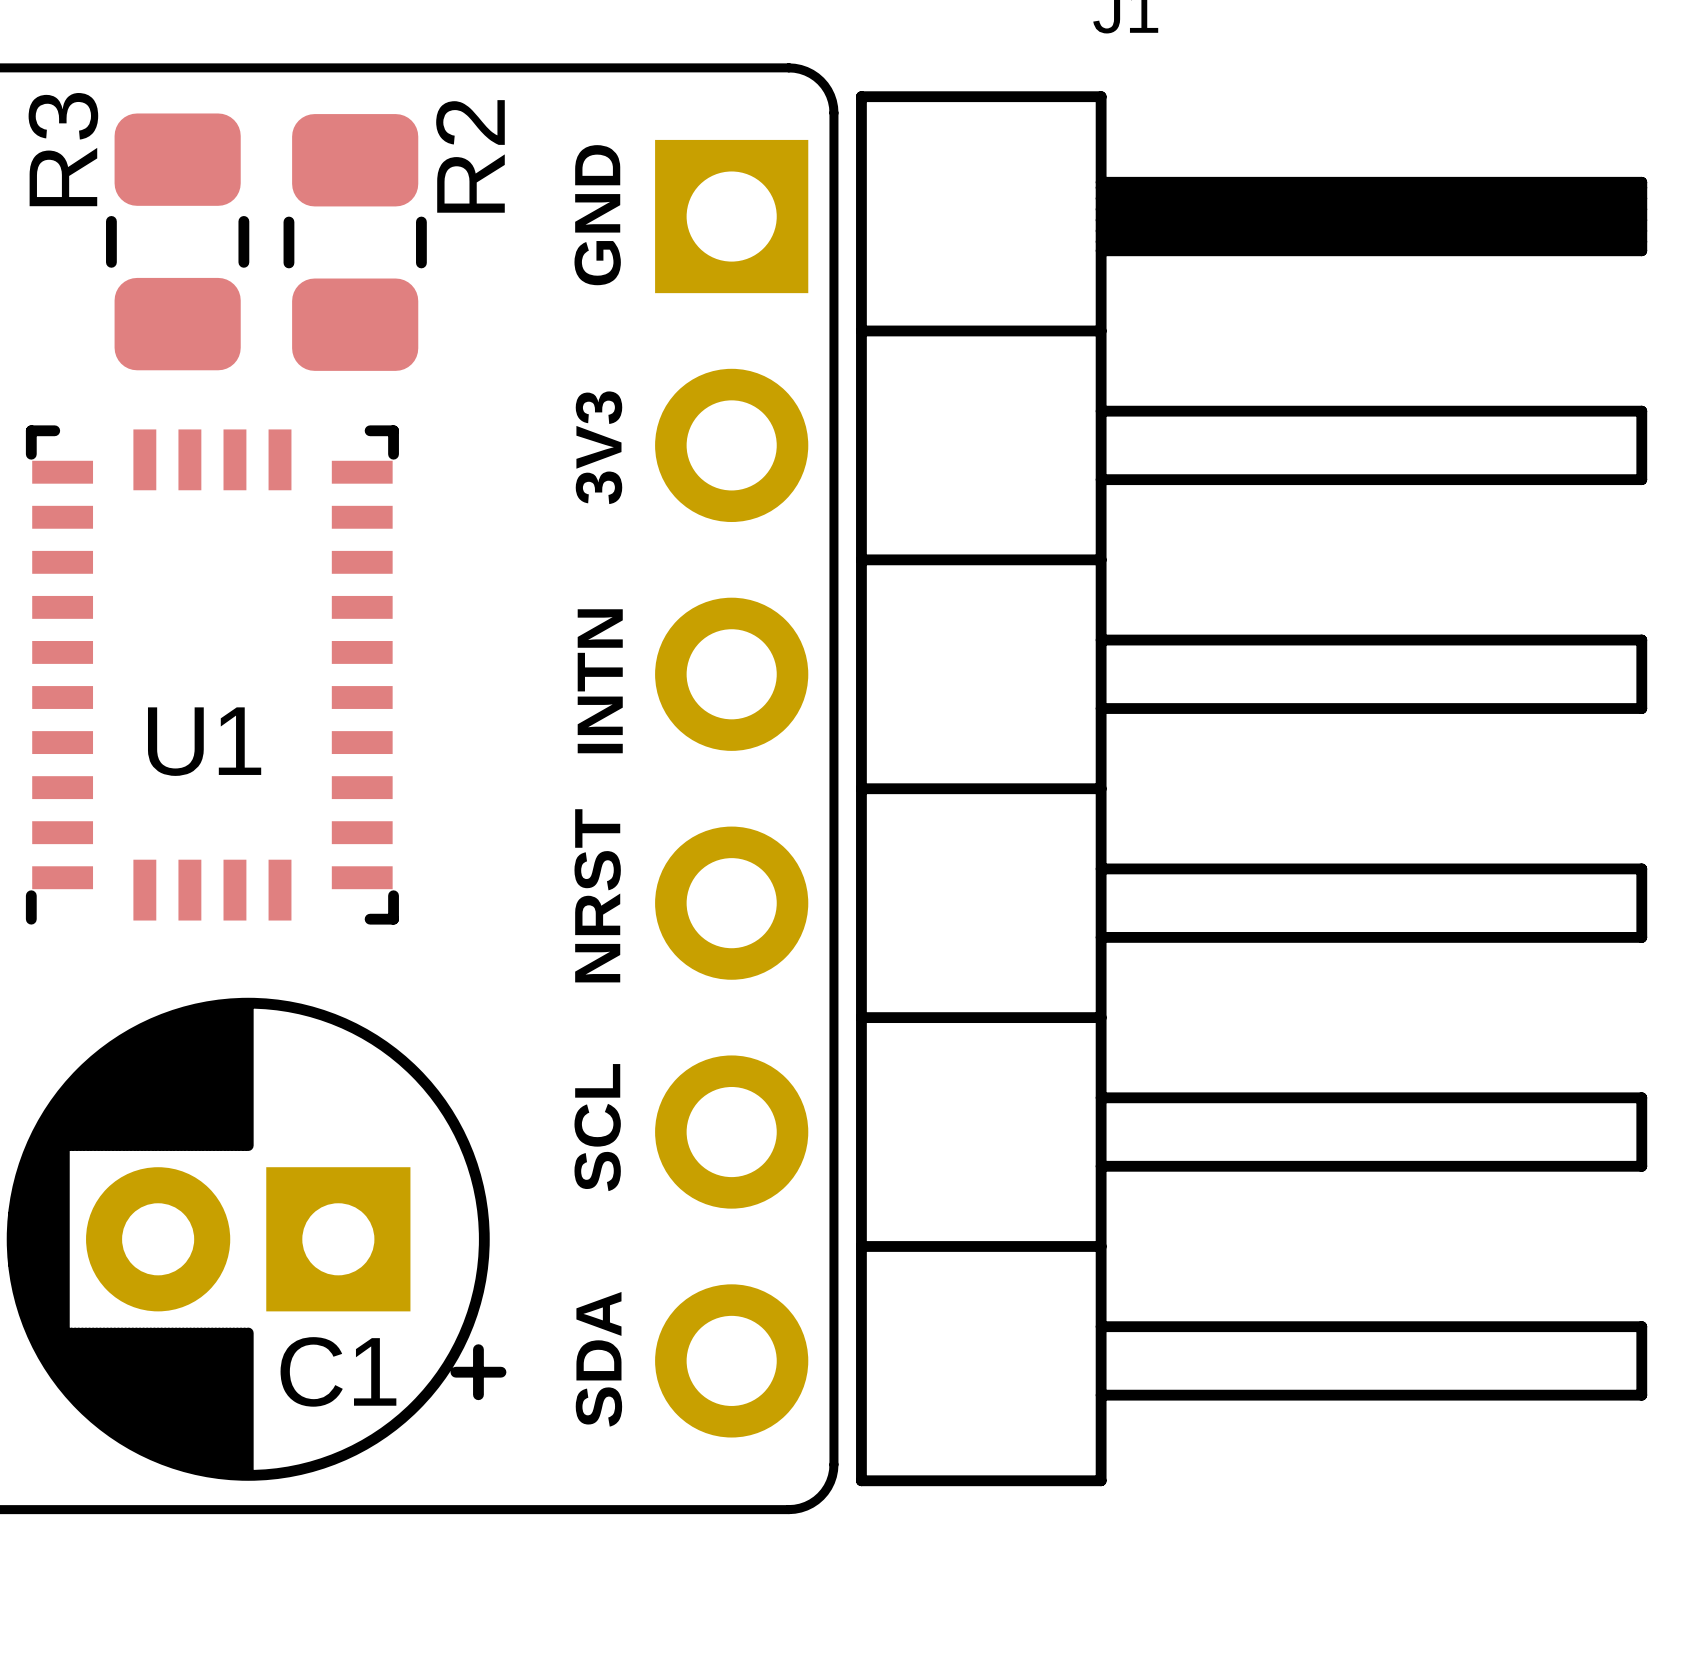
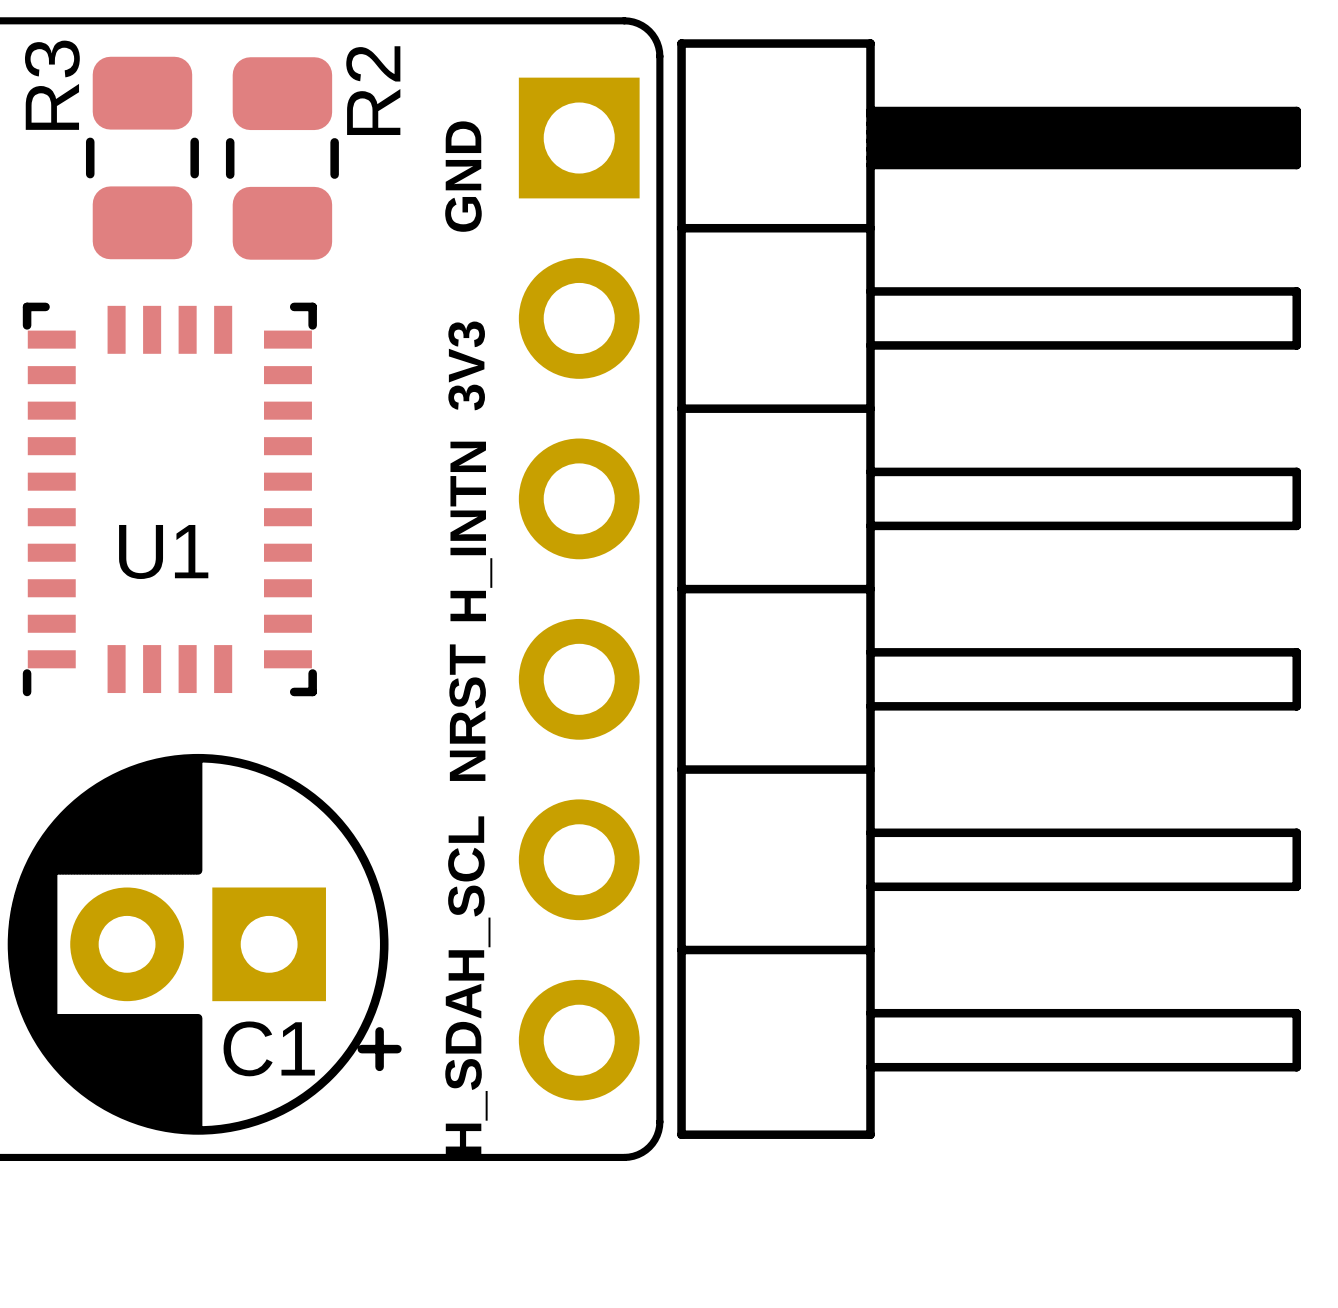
text position: GND (597, 215) -> GND (463, 176)
text position: 3V3 (598, 447) -> 3V3 (466, 365)
text: INTN (600, 681) -> H_INTN (471, 531)
text position: NRST (597, 895) -> NRST (467, 712)
text: SCL (597, 1127) -> H_SCL (469, 898)
text: SDA (598, 1359) -> H_SDA (466, 1068)

